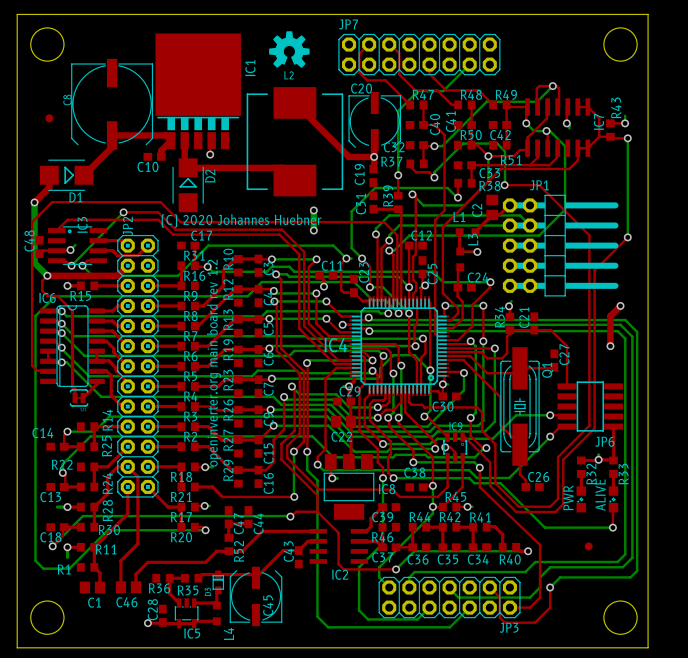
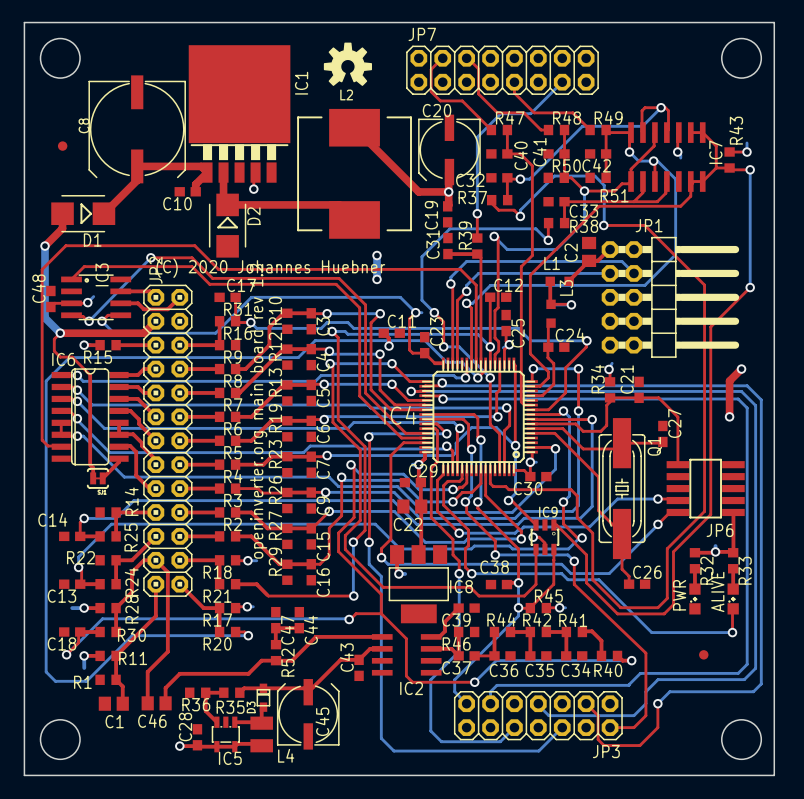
L4 footprint: [212, 601, 221, 626] -> [250, 716, 273, 753]
L4 name rotation: 0° (228, 634) -> 90° clockwise (286, 755)

